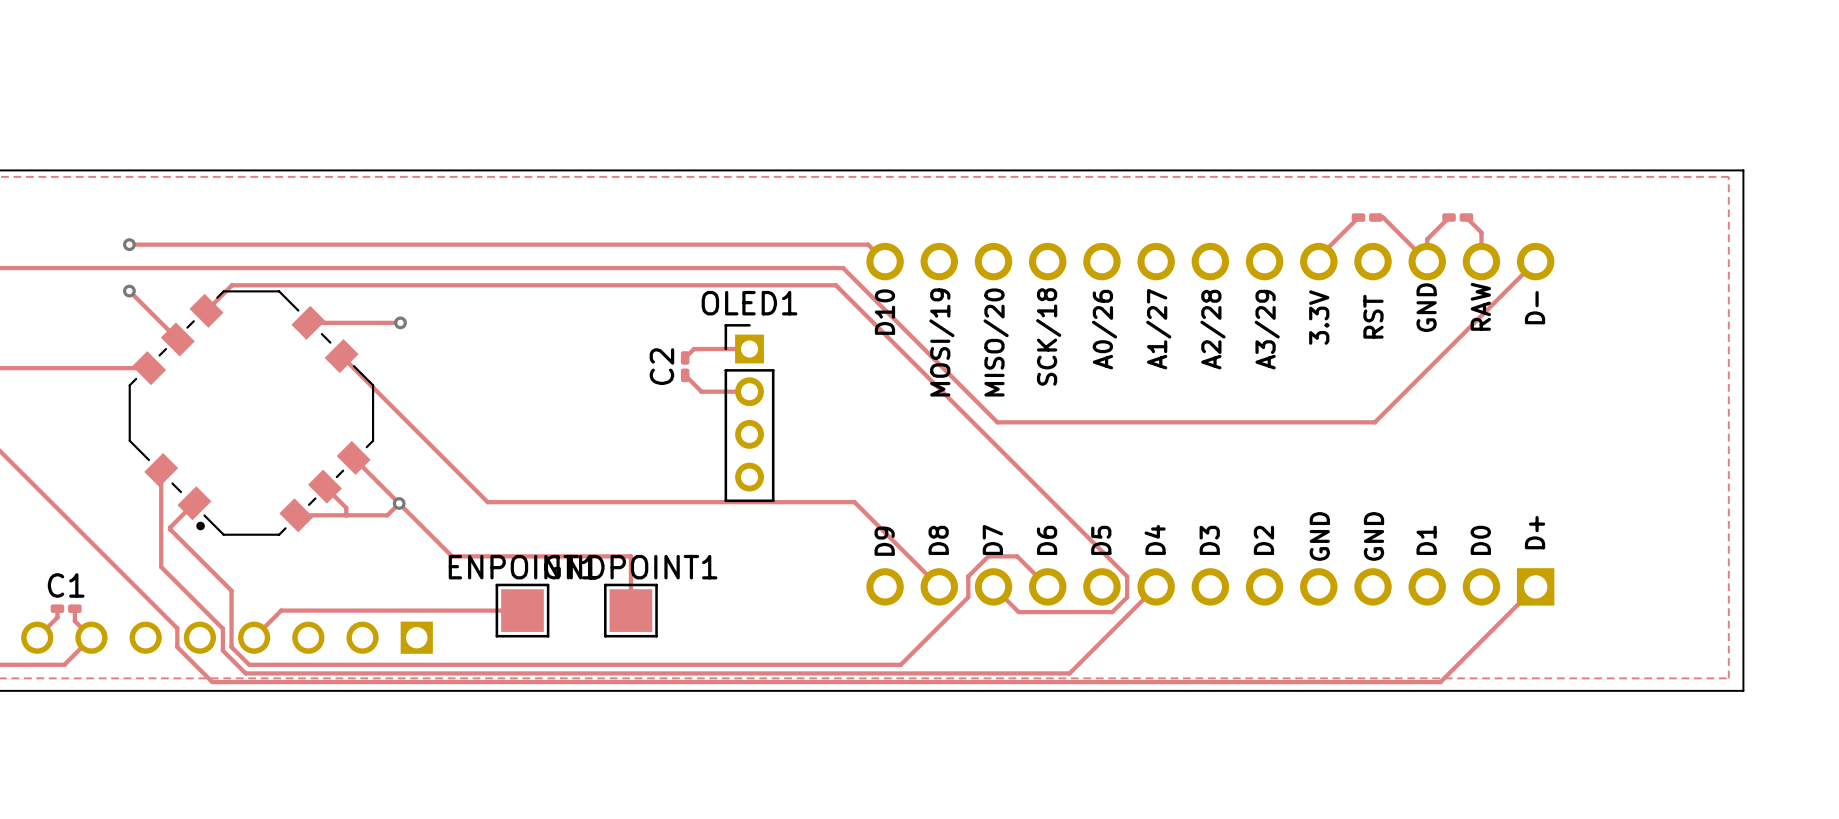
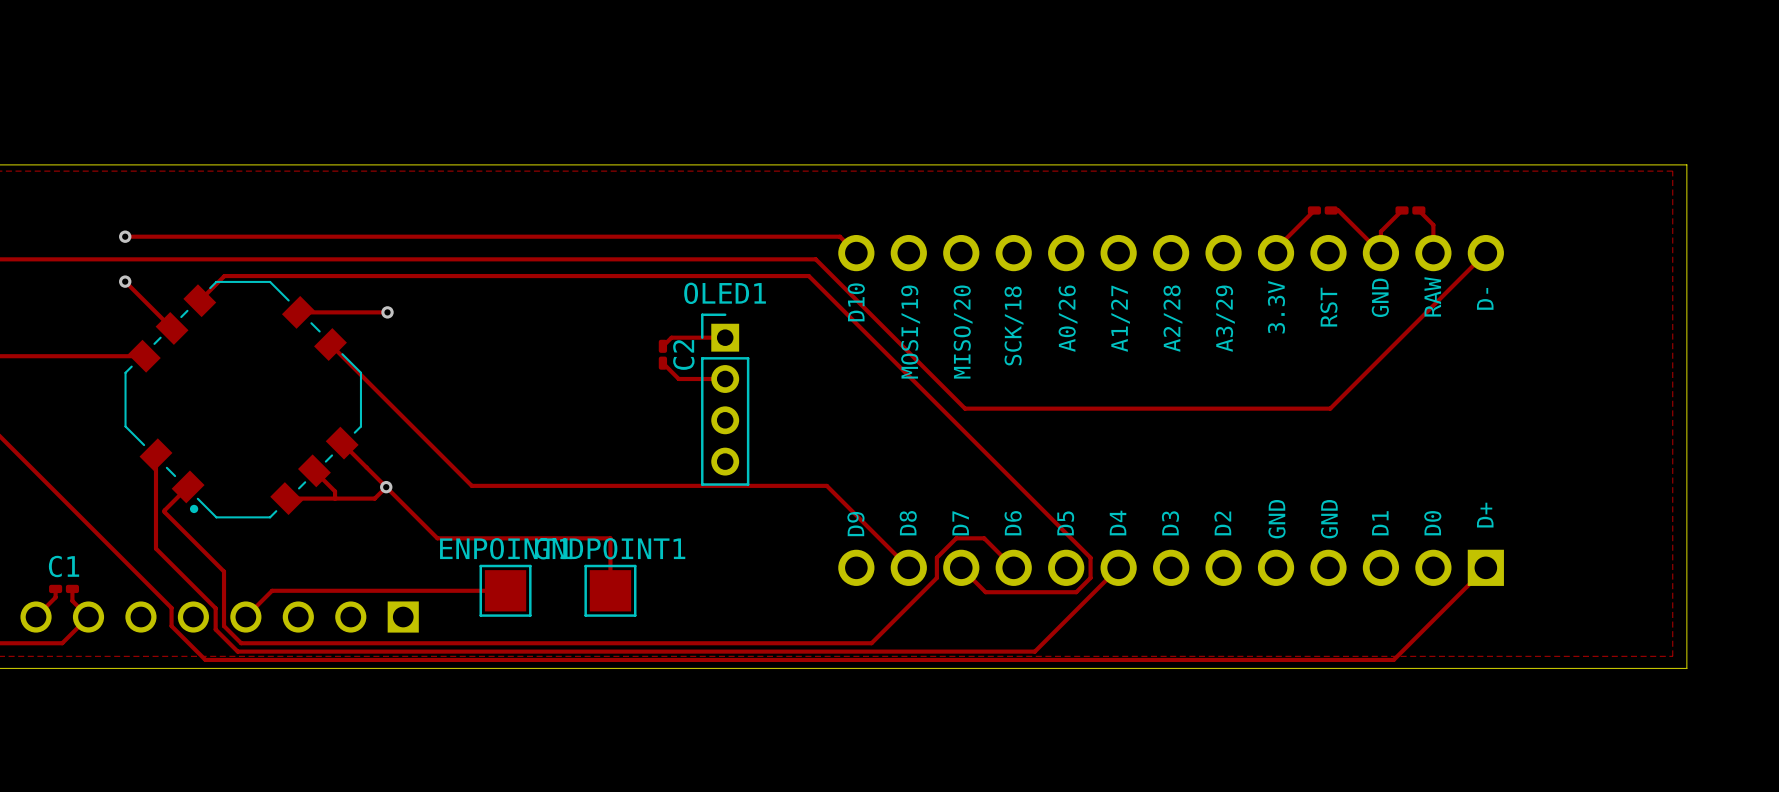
C2 name position: C2 (661, 366) -> C2 (683, 354)

